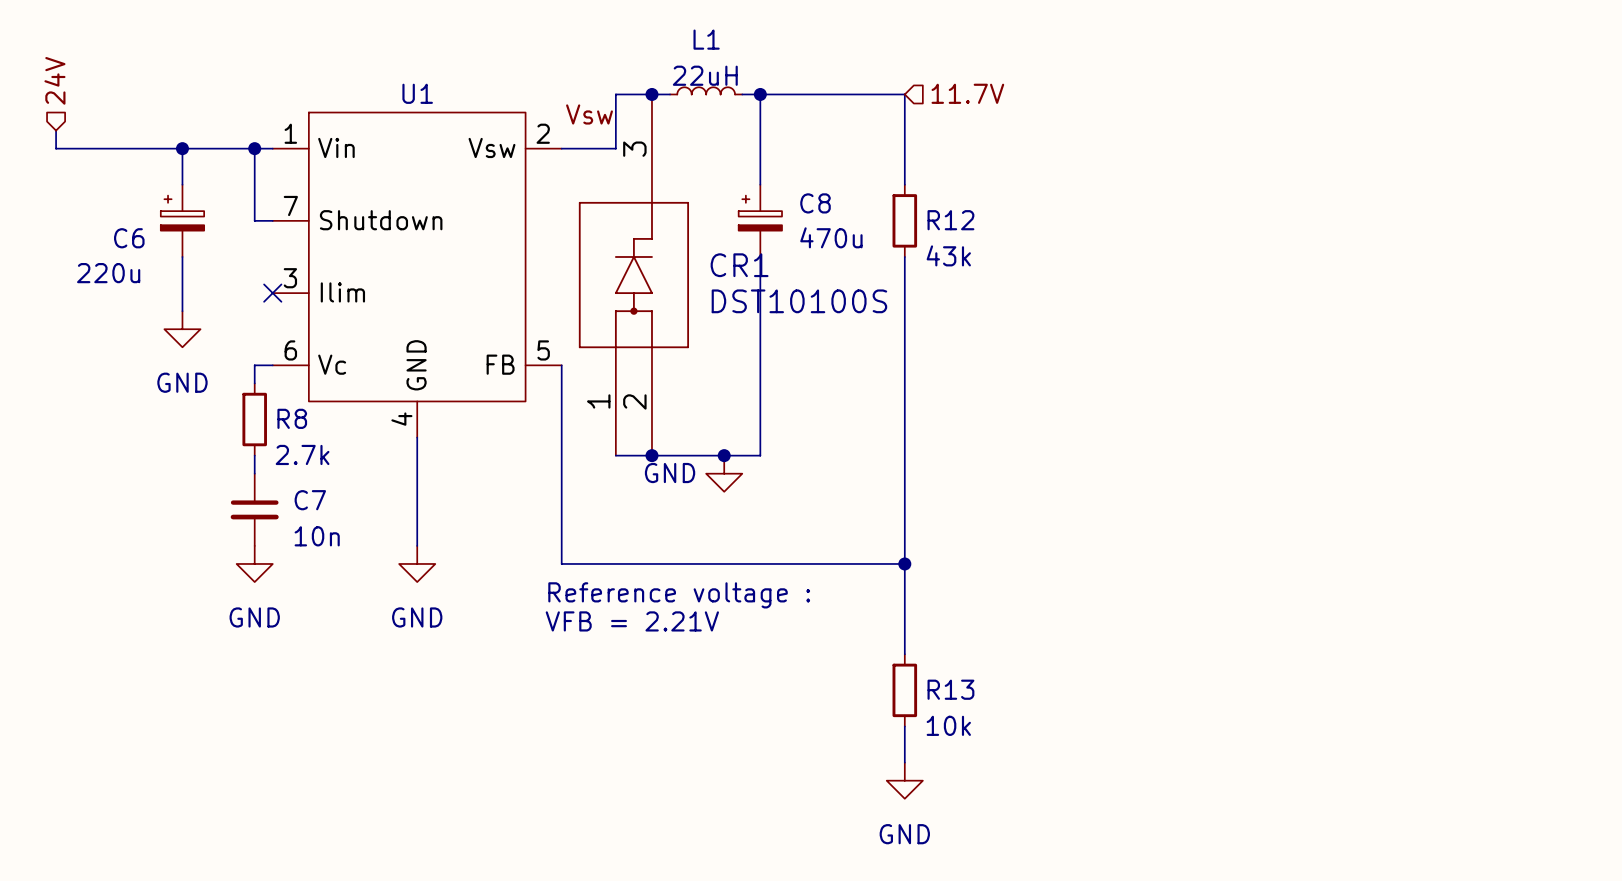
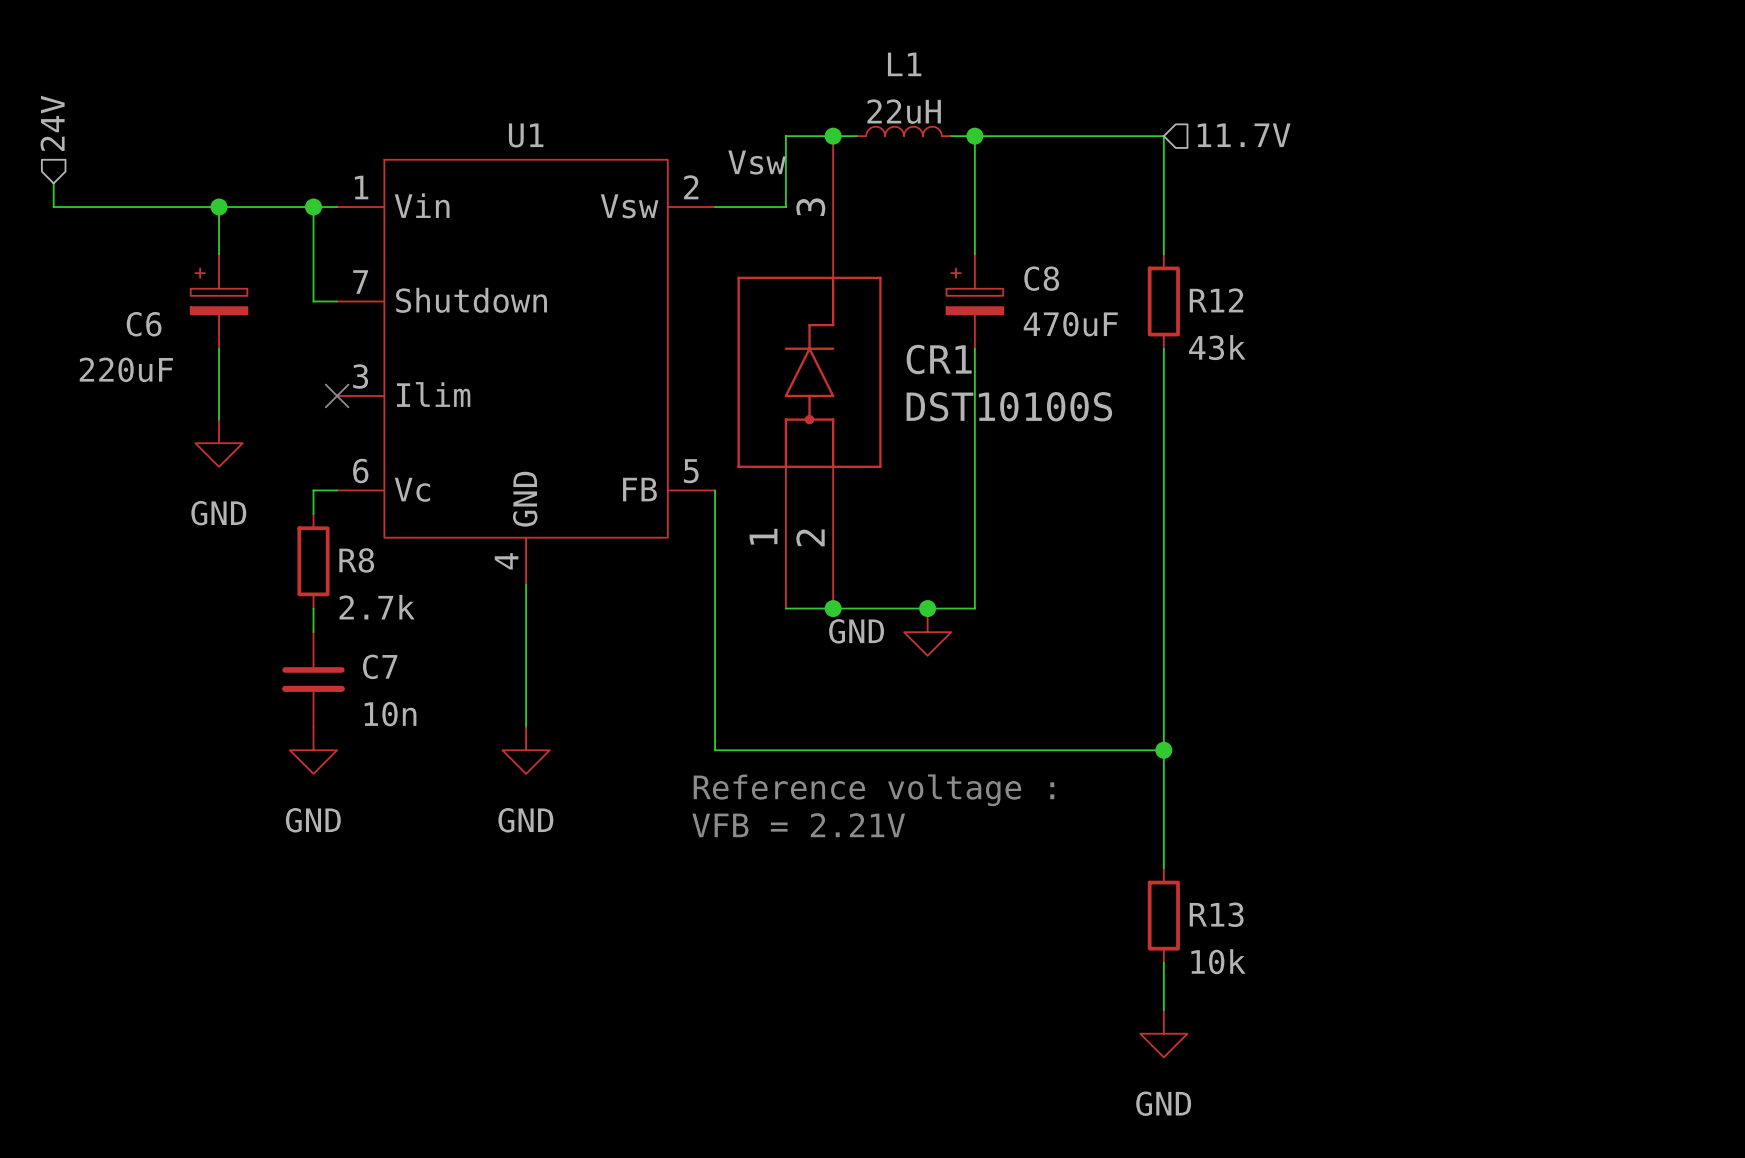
C8 value: 470u (831, 237) -> 470uF (1070, 324)
C6 value: 220u (108, 273) -> 220uF (126, 369)

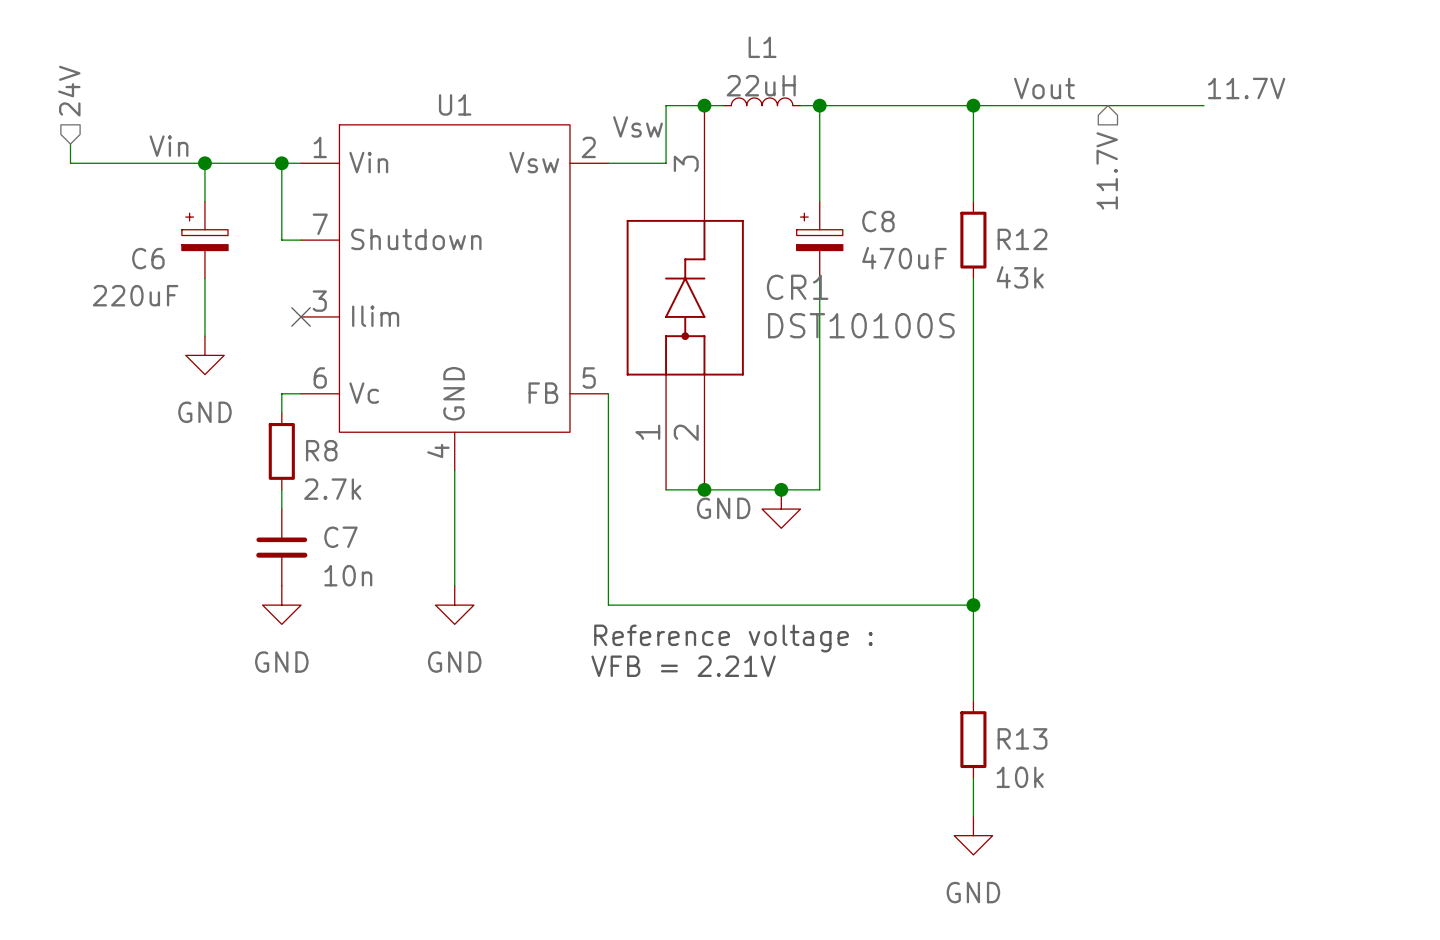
label: none -> Vout (1044, 88)
label: none -> 11.7V (1246, 88)
hierarchical label rotation: 0° (1244, 135) -> 90° clockwise (1107, 170)
wire: none -> (973, 105) (1203, 105)
junction: none -> (973, 105)
label: none -> Vin (168, 146)

